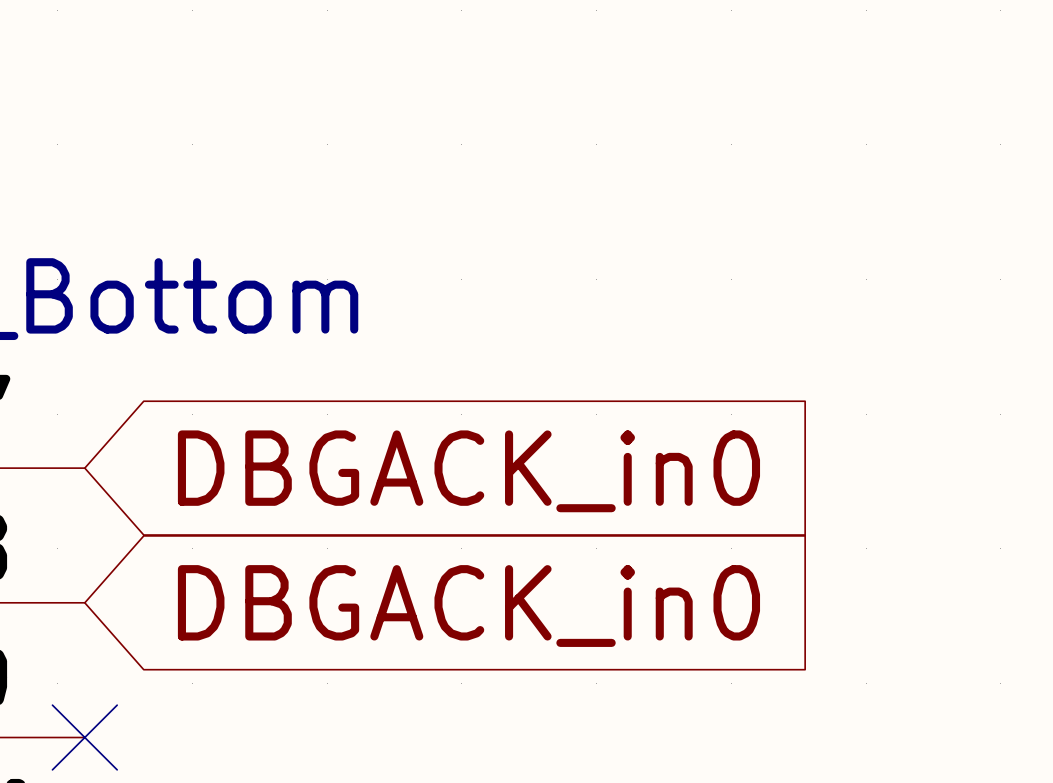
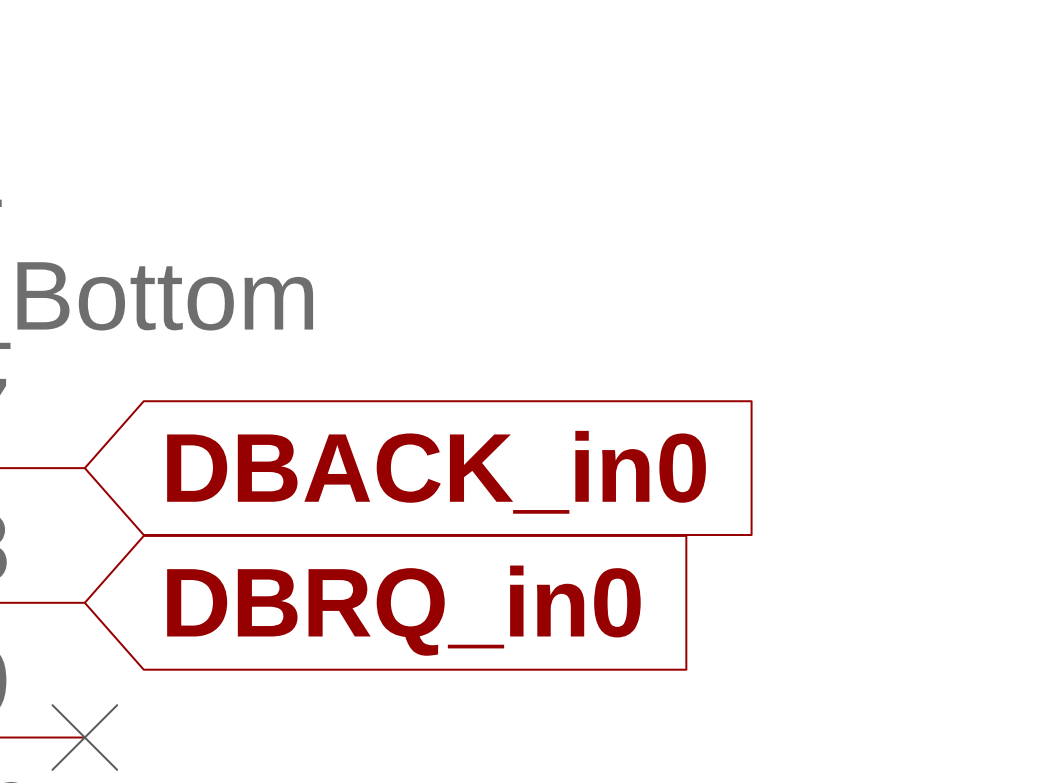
global label: DBGACK_in0 (468, 471) -> DBACK_in0 (436, 472)
global label: DBGACK_in0 (468, 606) -> DBRQ_in0 (403, 610)

